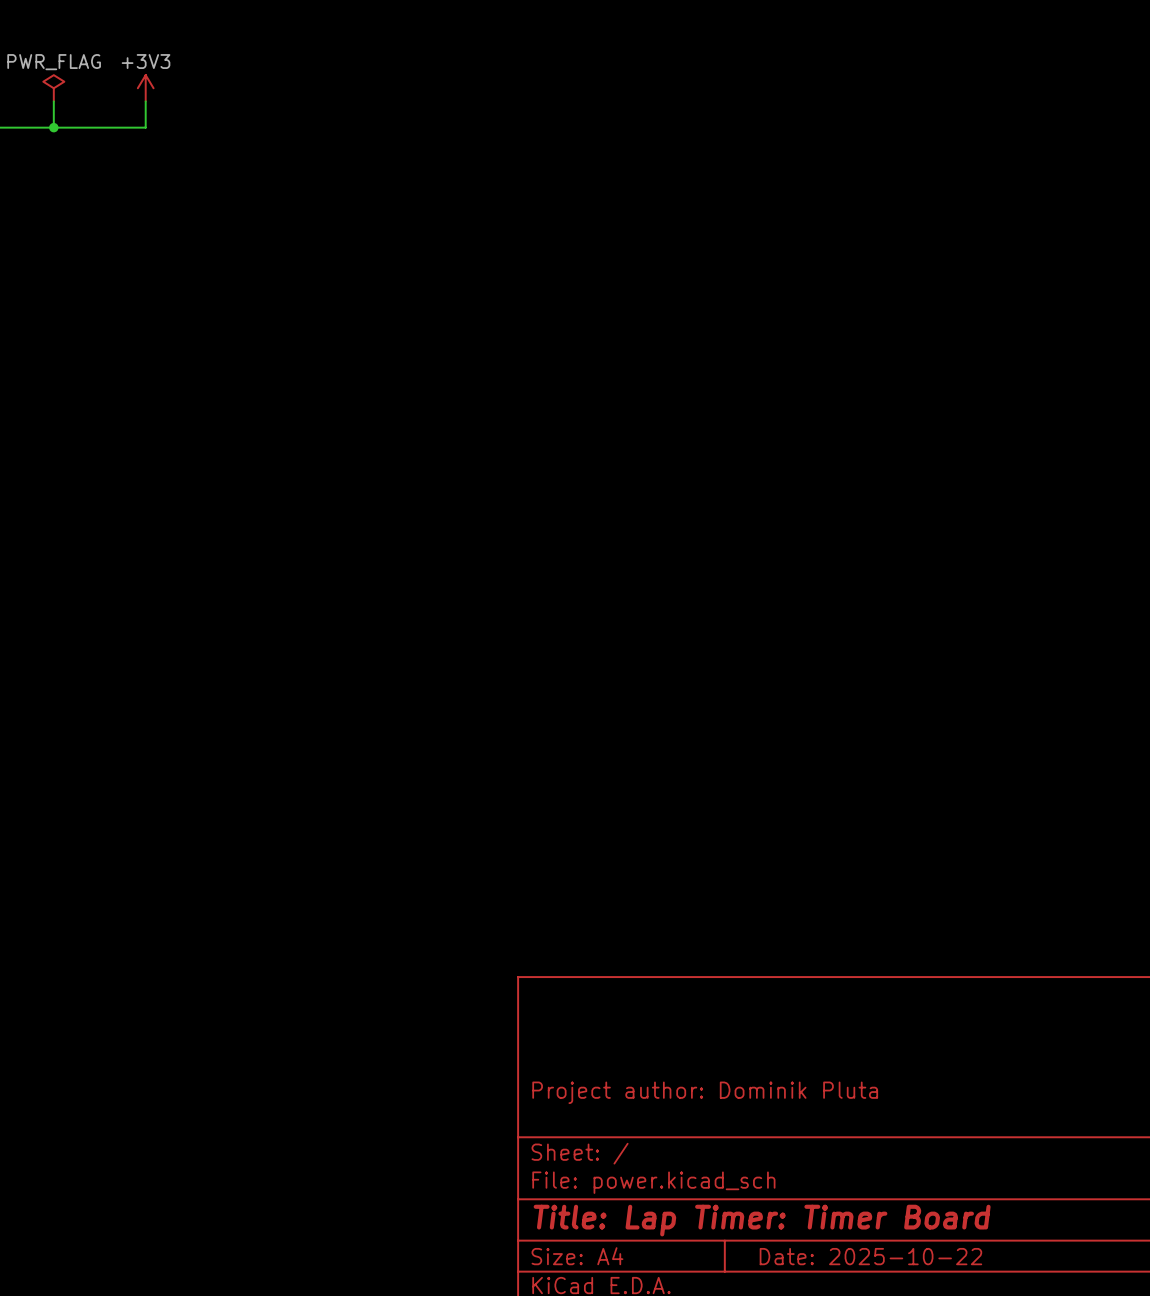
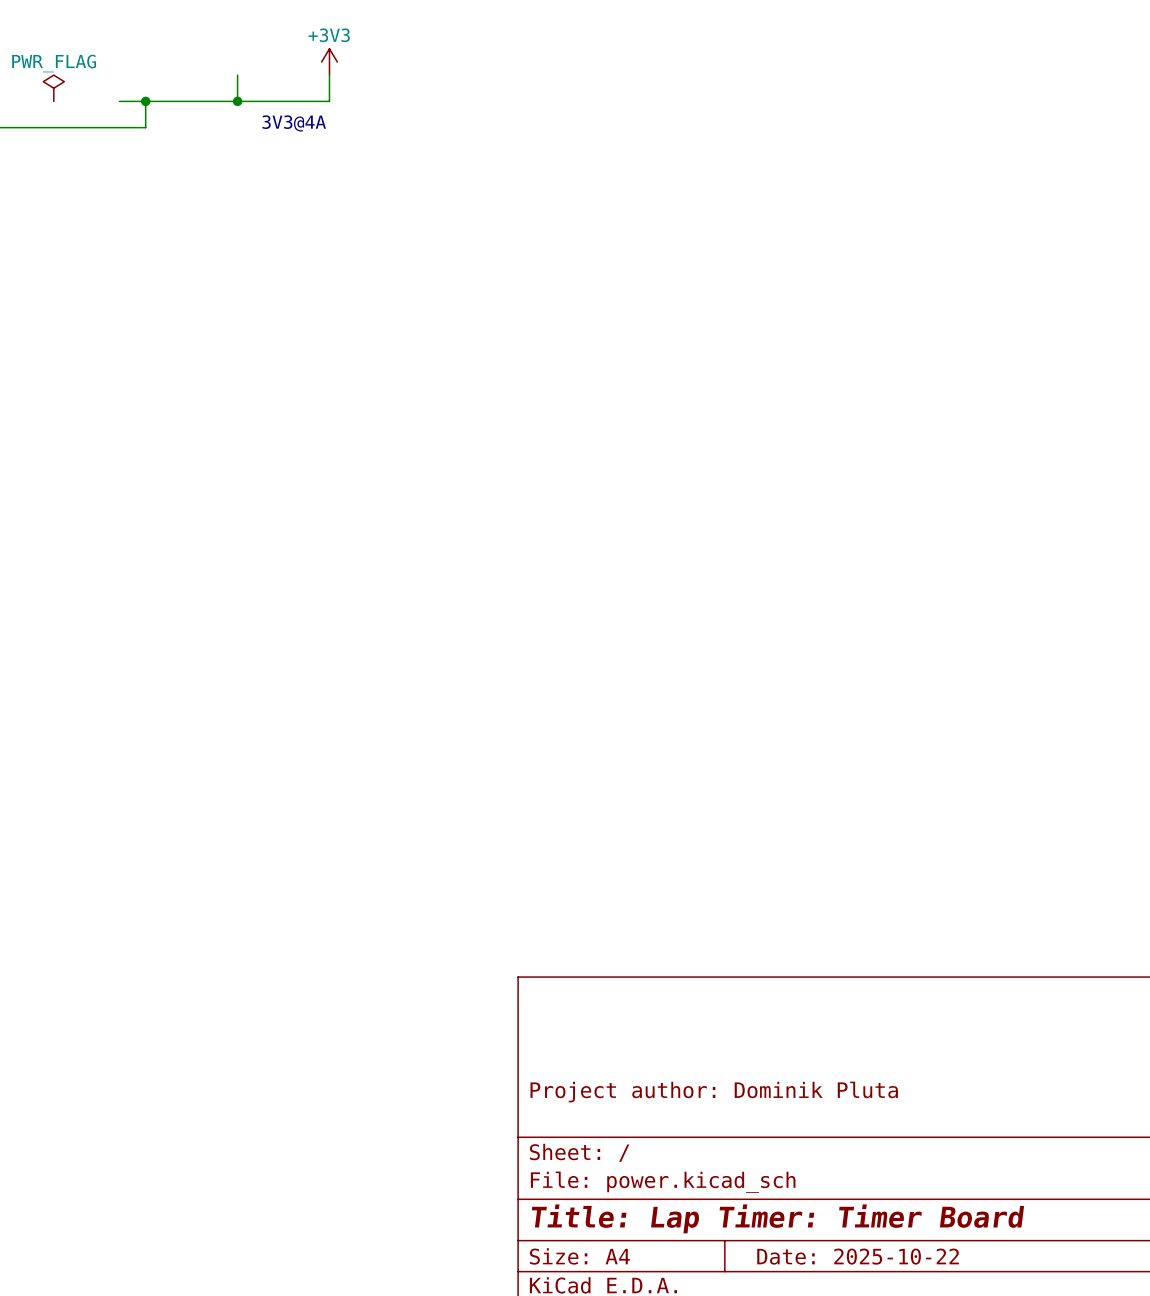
wire: none -> (329, 75) (329, 101) (119, 101)
power symbol position: +3V3 (145, 88) -> +3V3 (329, 62)
wire: (53, 101) (53, 127) -> (237, 75) (237, 101)
junction: none -> (145, 101)
junction: none -> (237, 101)
text: none -> 3V3@4A (294, 123)
junction: (53, 127) -> none

